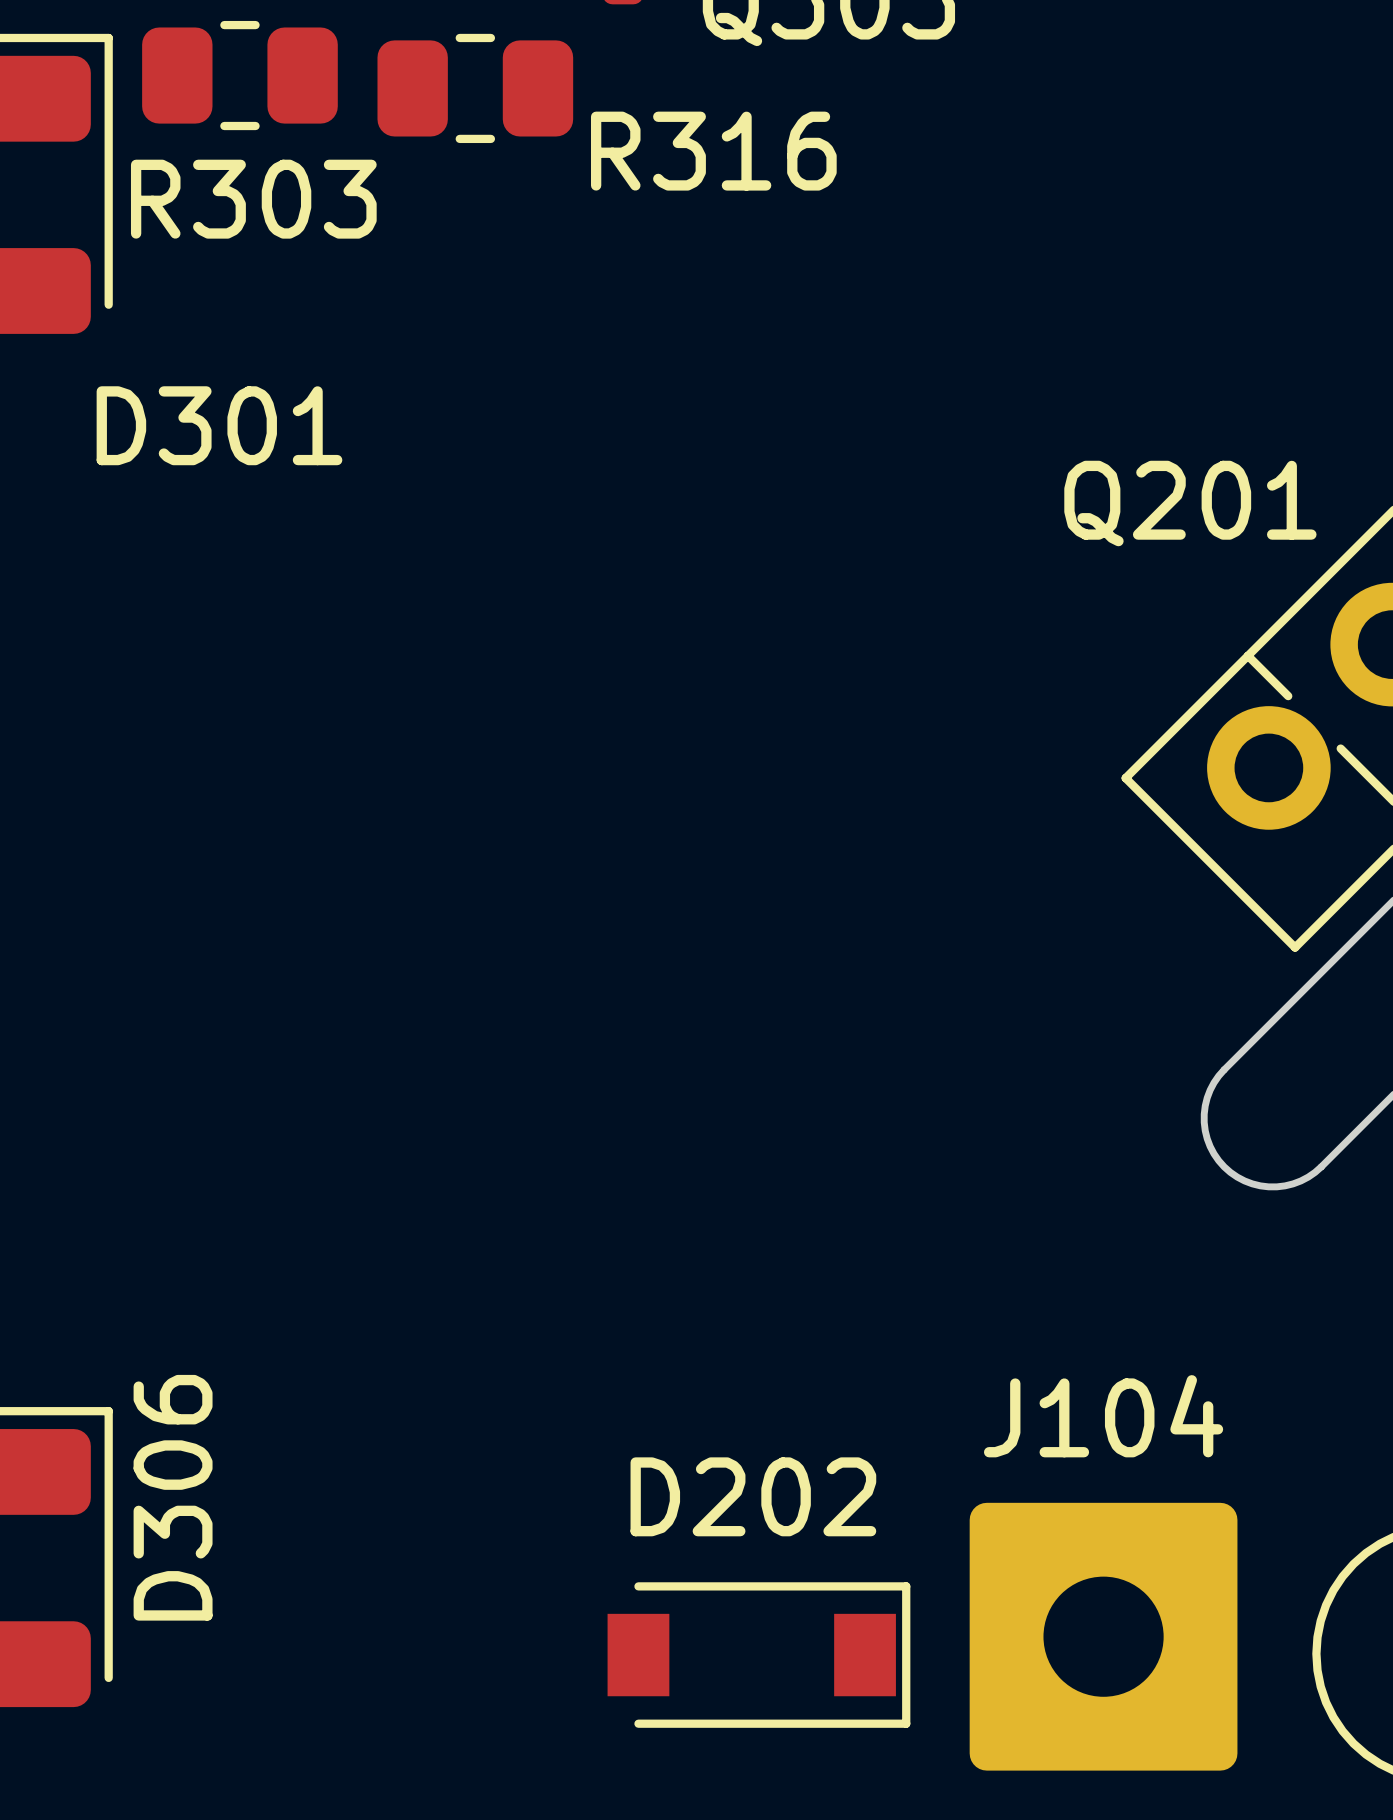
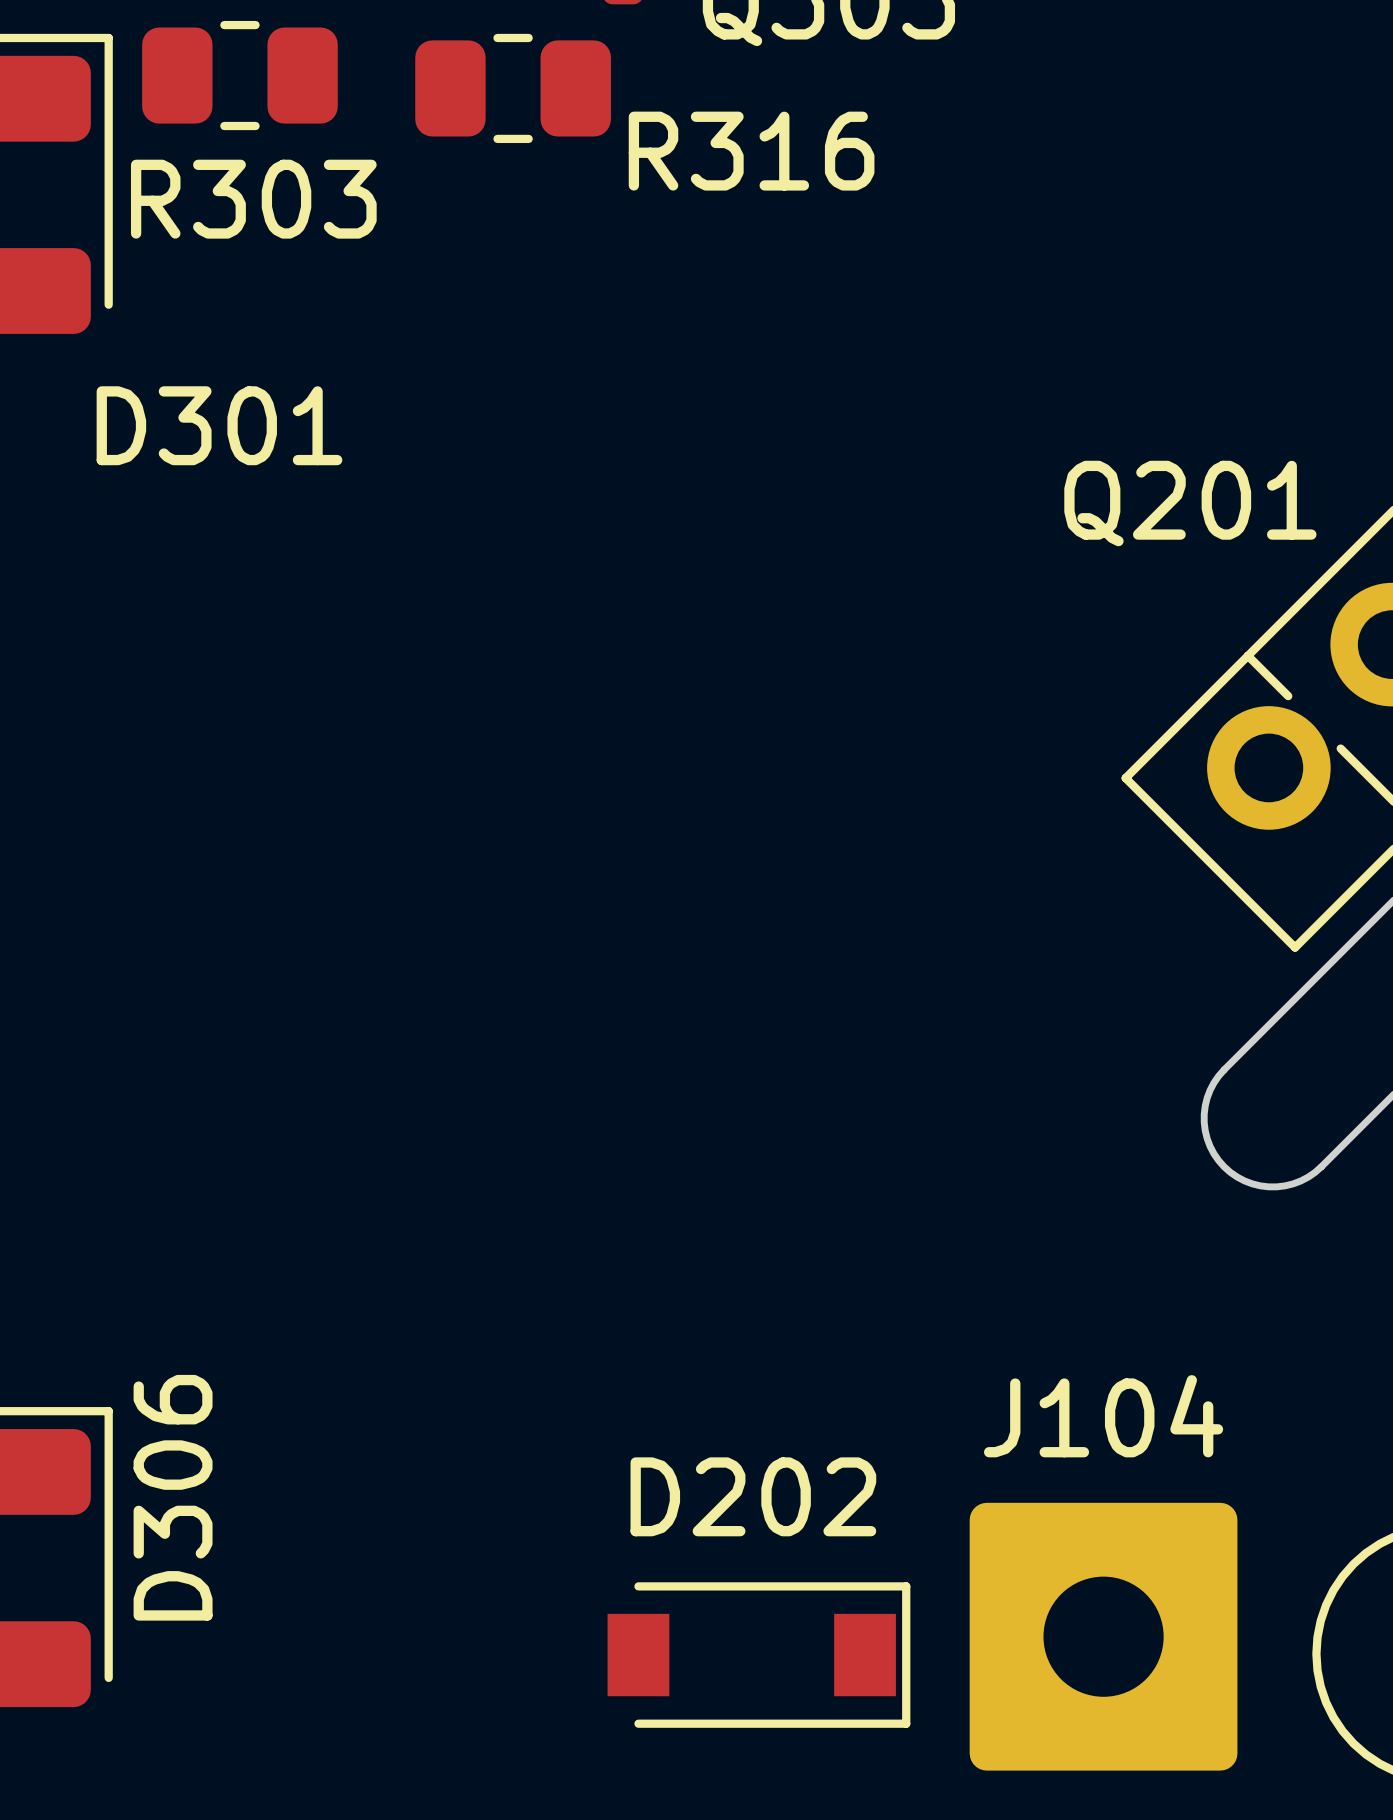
R316 position: (475, 88) -> (513, 88)

